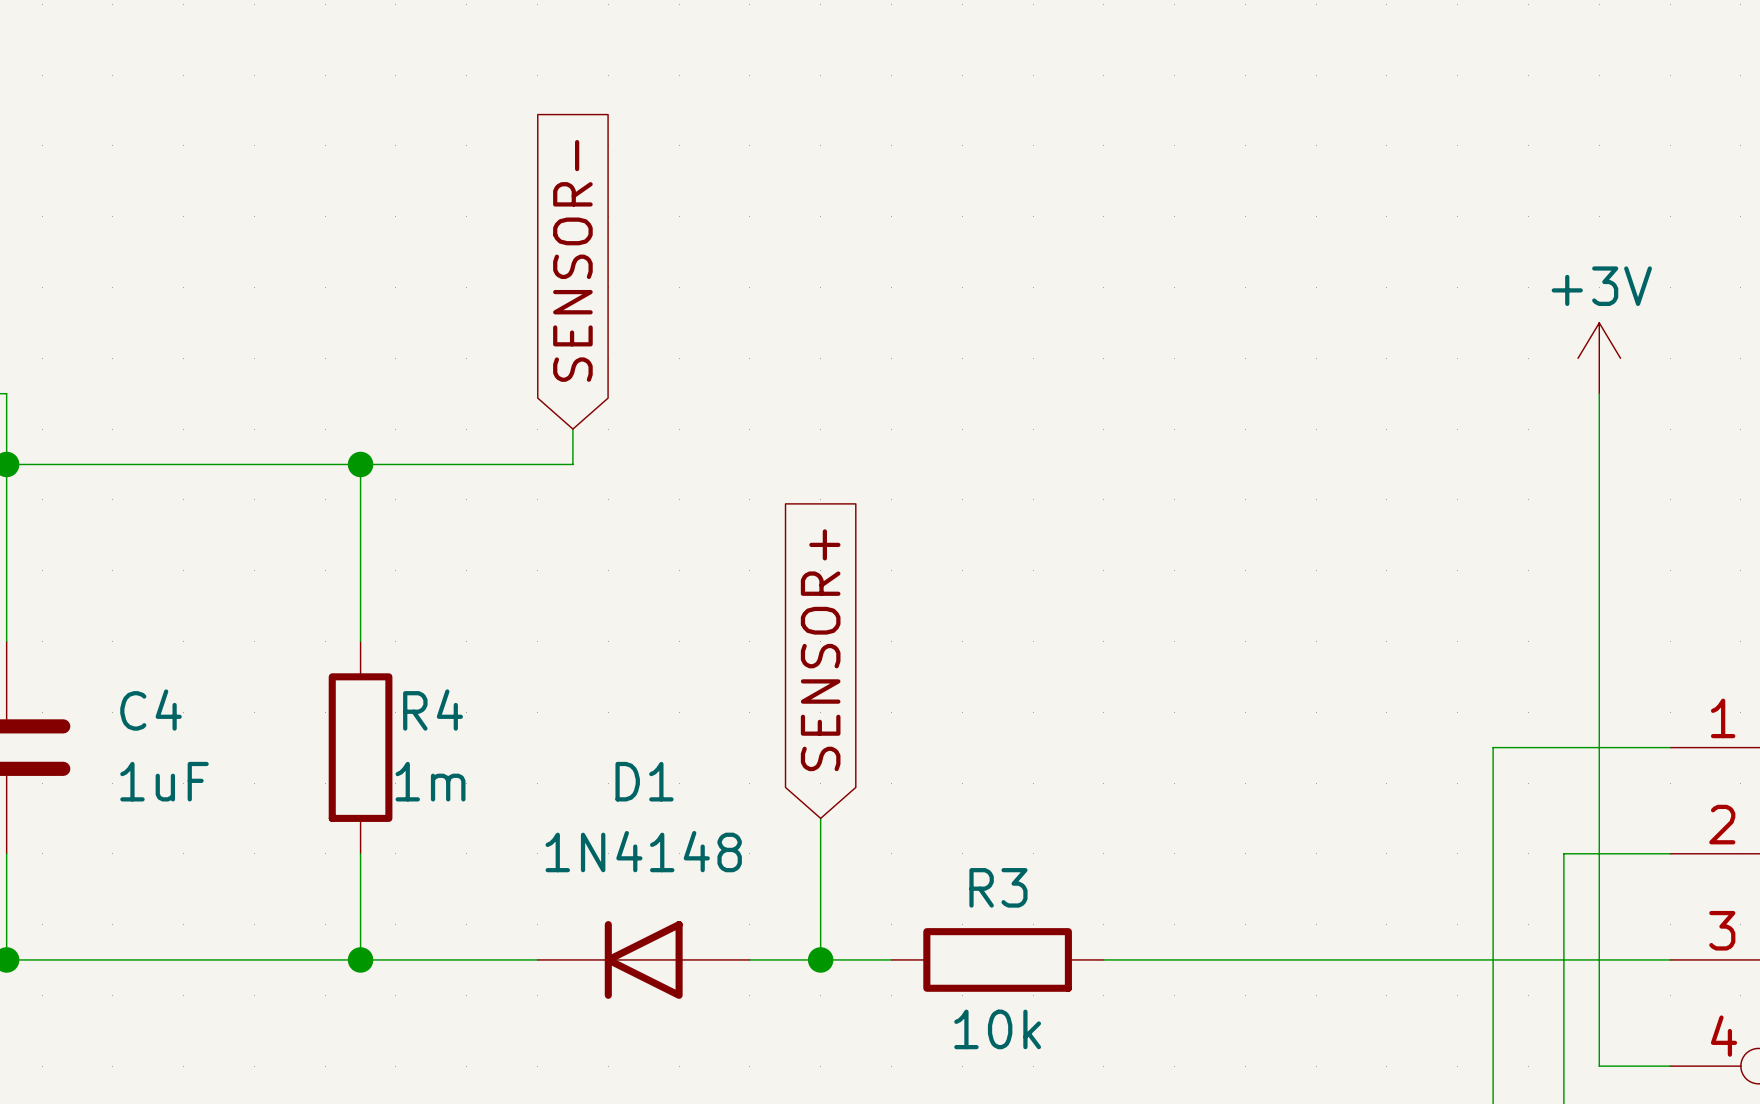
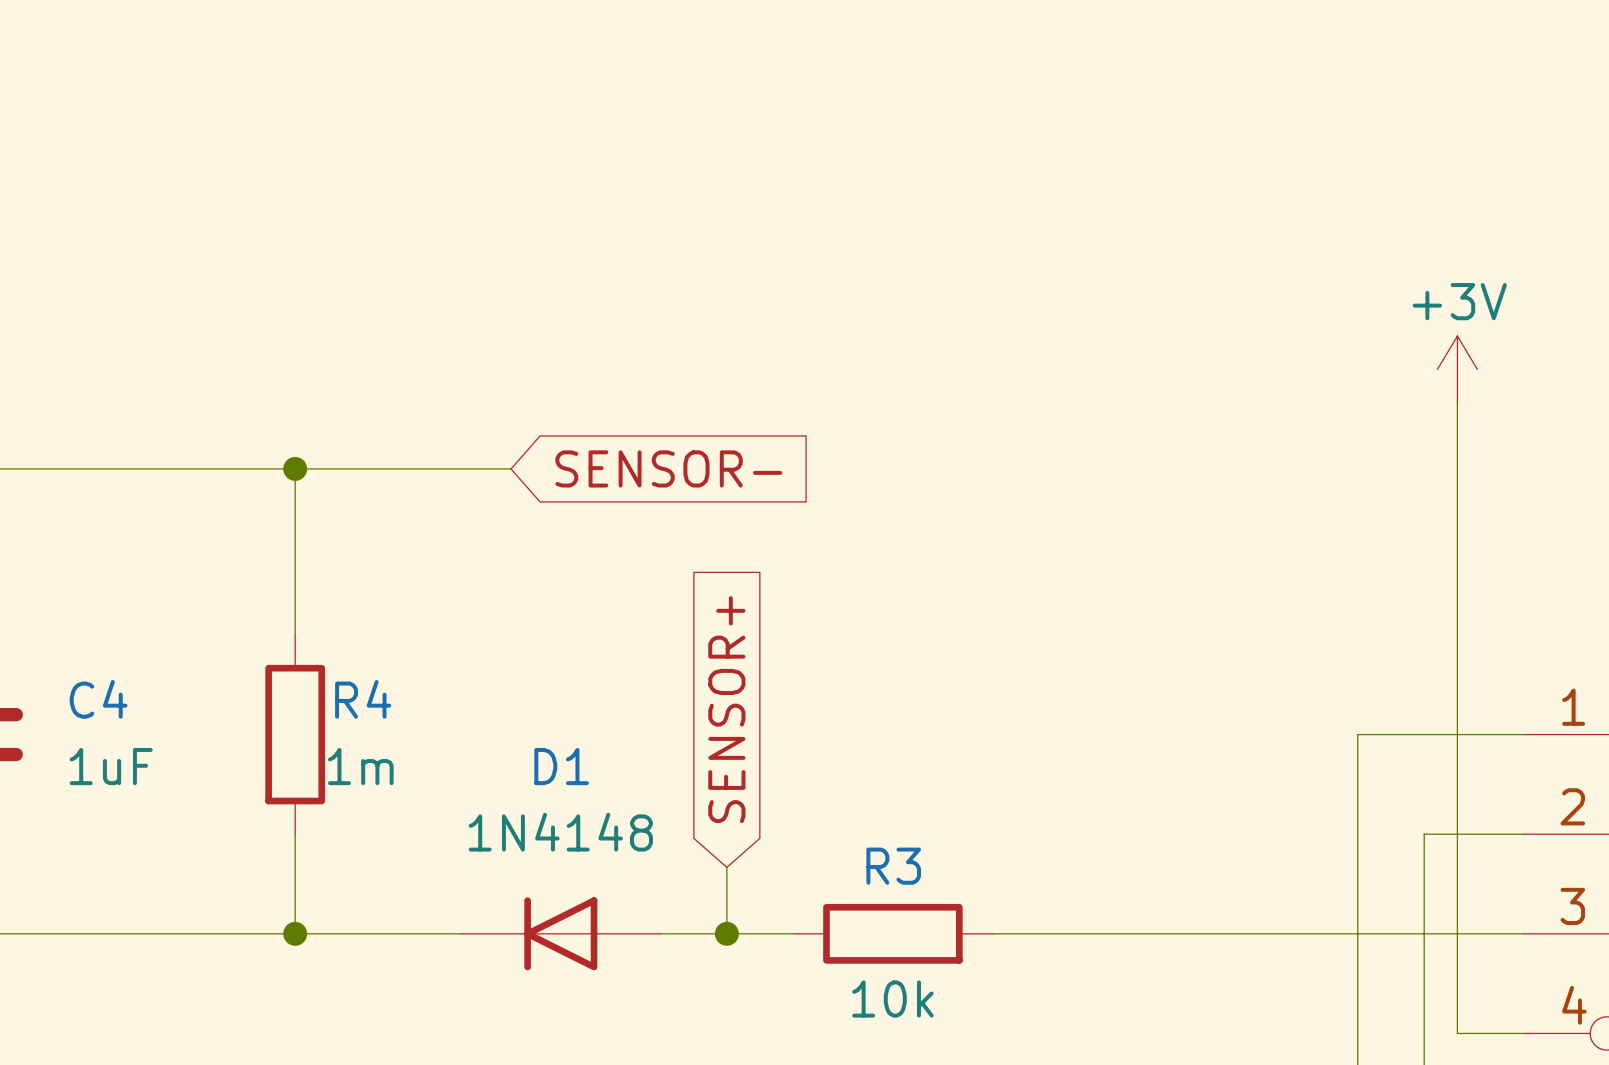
global label rotation: 0° (572, 260) -> 90° clockwise (668, 468)
wire: (572, 429) (572, 464) -> (511, 468) (494, 468)
global label position: SENSOR+ (820, 650) -> SENSOR+ (726, 709)
wire: (820, 818) (820, 889) -> none

